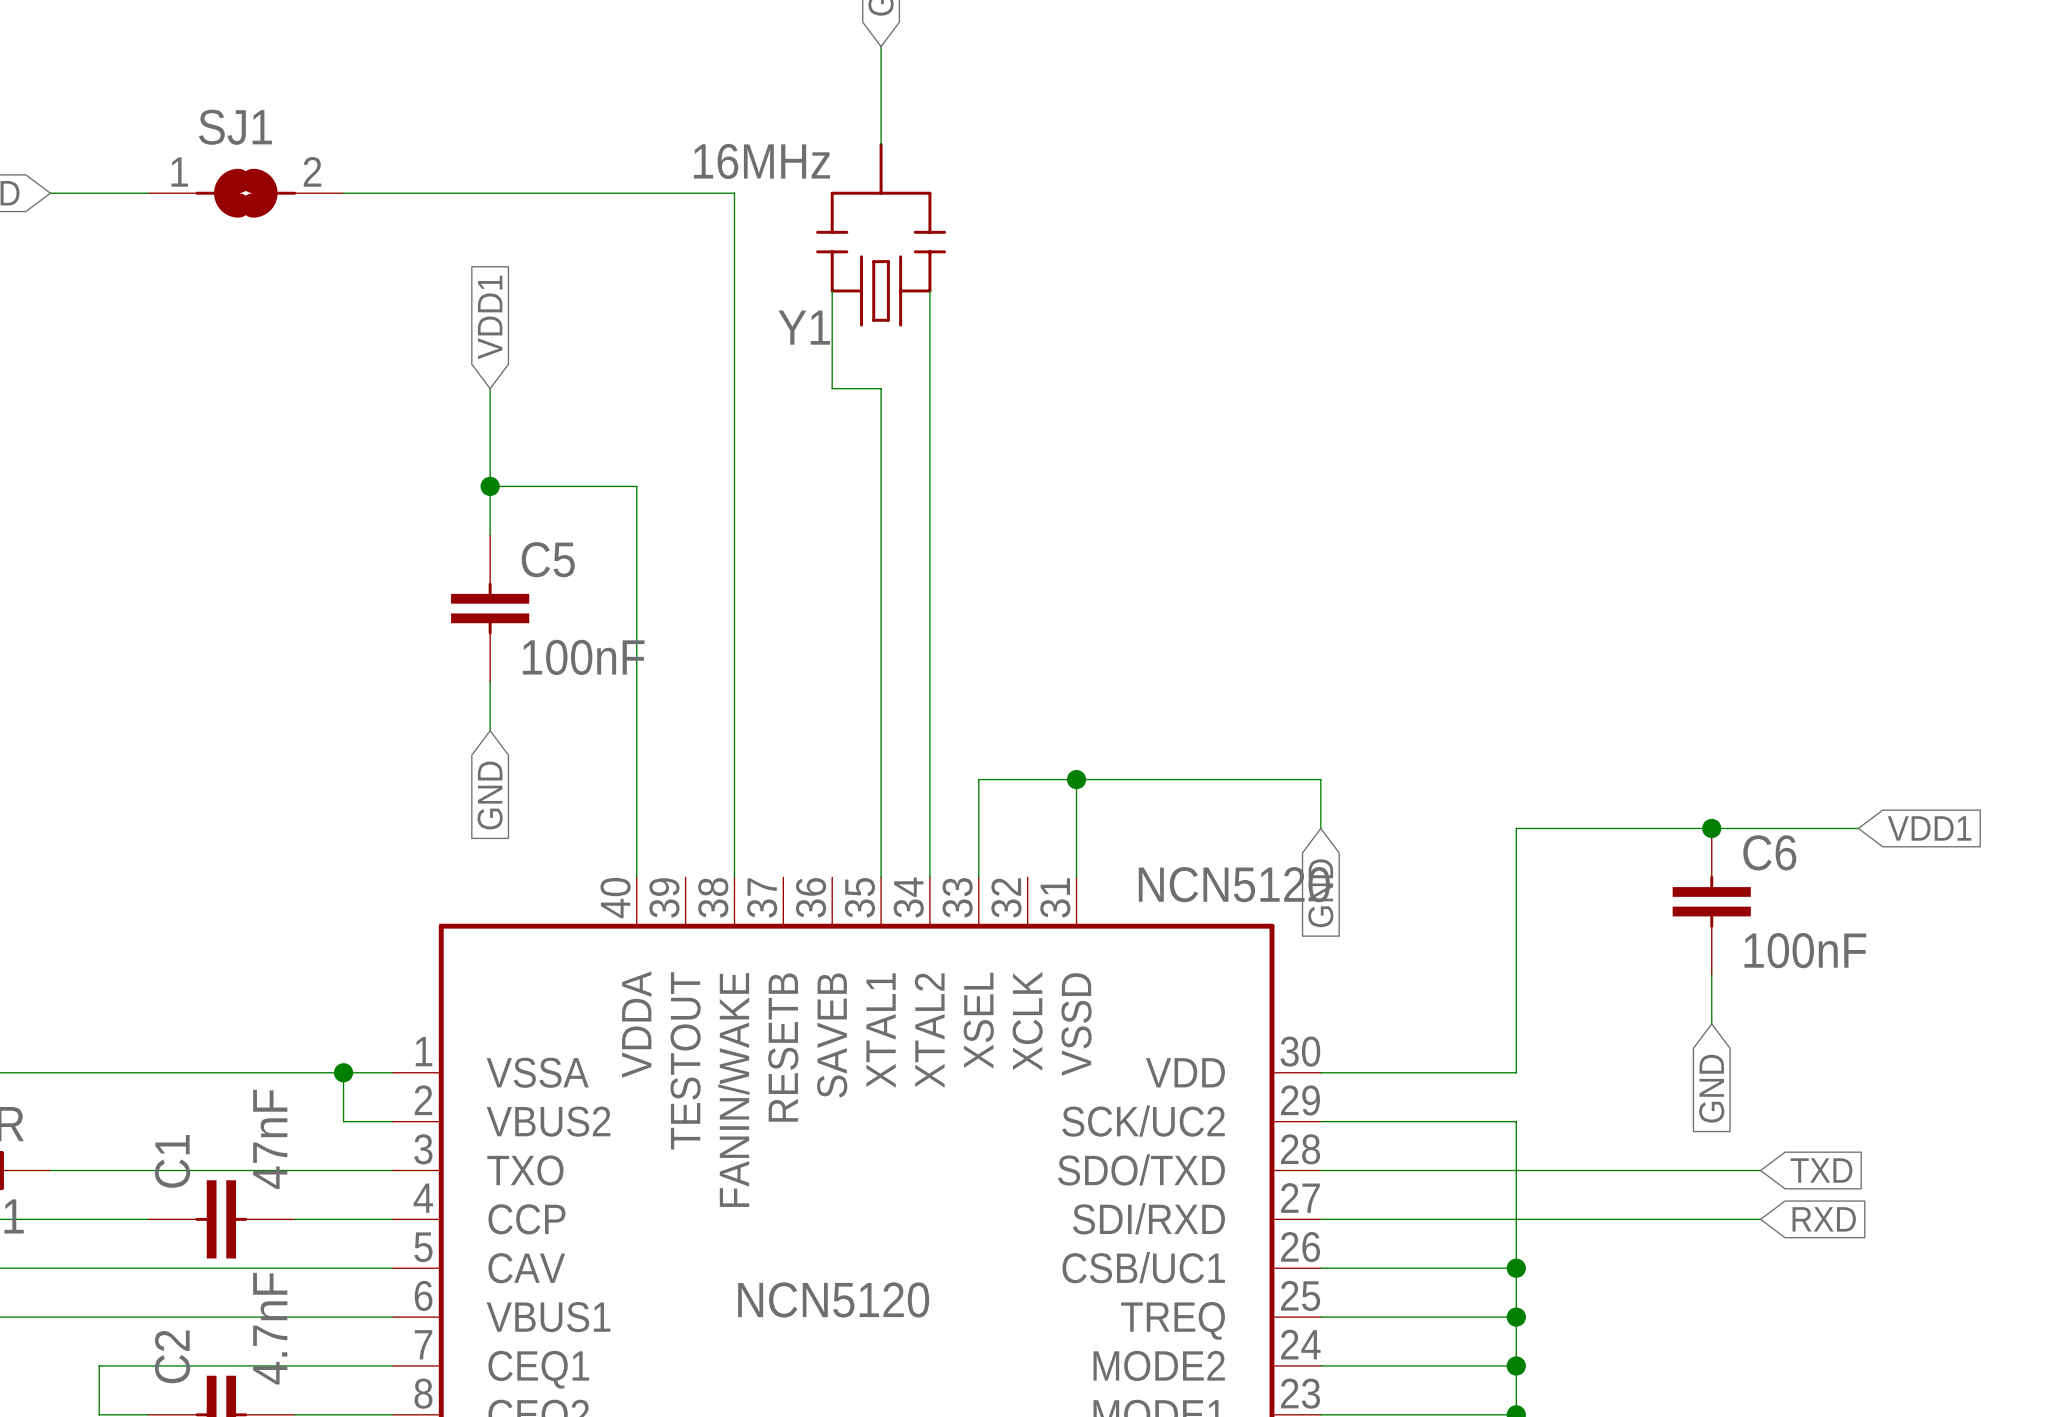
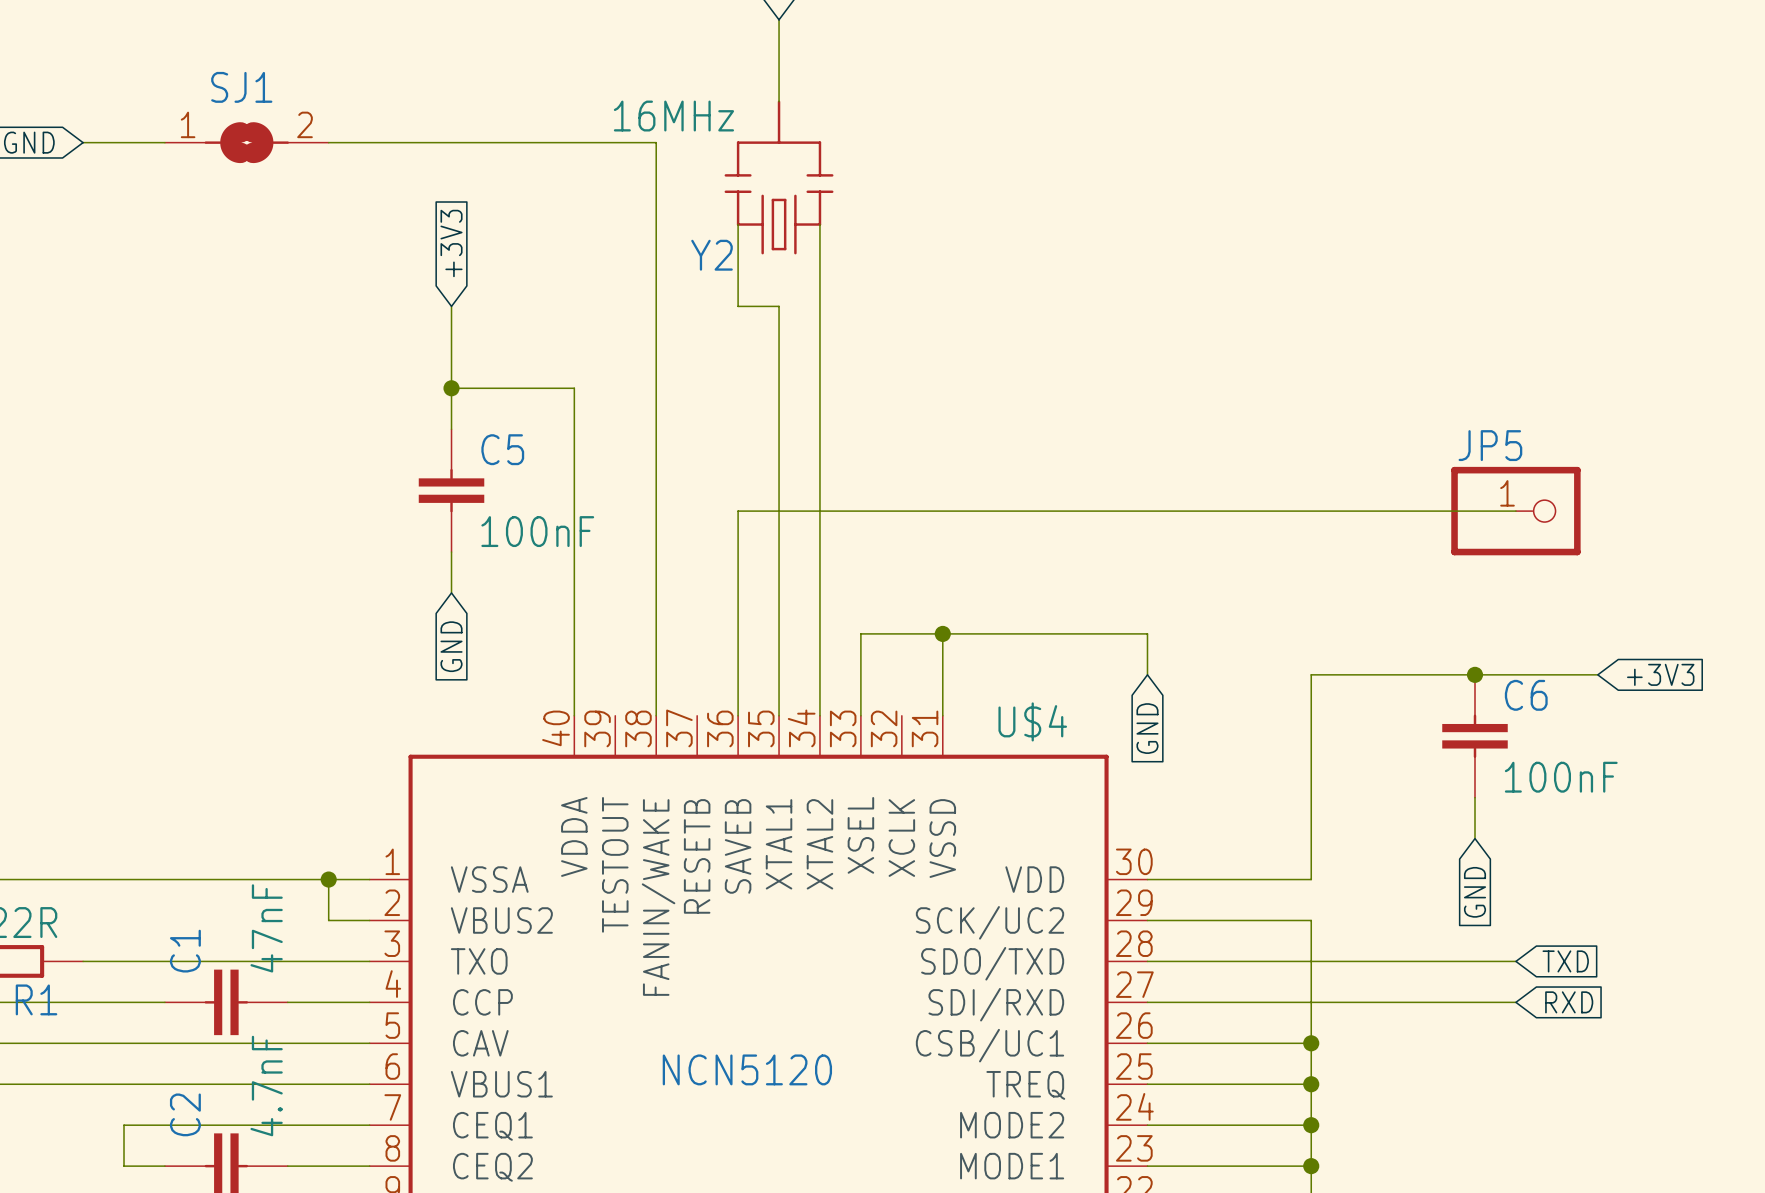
global label: VDD1 (490, 317) -> +3V3 (451, 243)
Y1 name: Y1 (804, 327) -> Y2 (712, 255)
wire: none -> (1515, 511) (738, 511) (738, 715)
JP5: none -> (1515, 511)
global label: VDD1 (1929, 828) -> +3V3 (1660, 674)
NCN5120 name: NCN5120 (1234, 884) -> U$4 (1032, 721)

